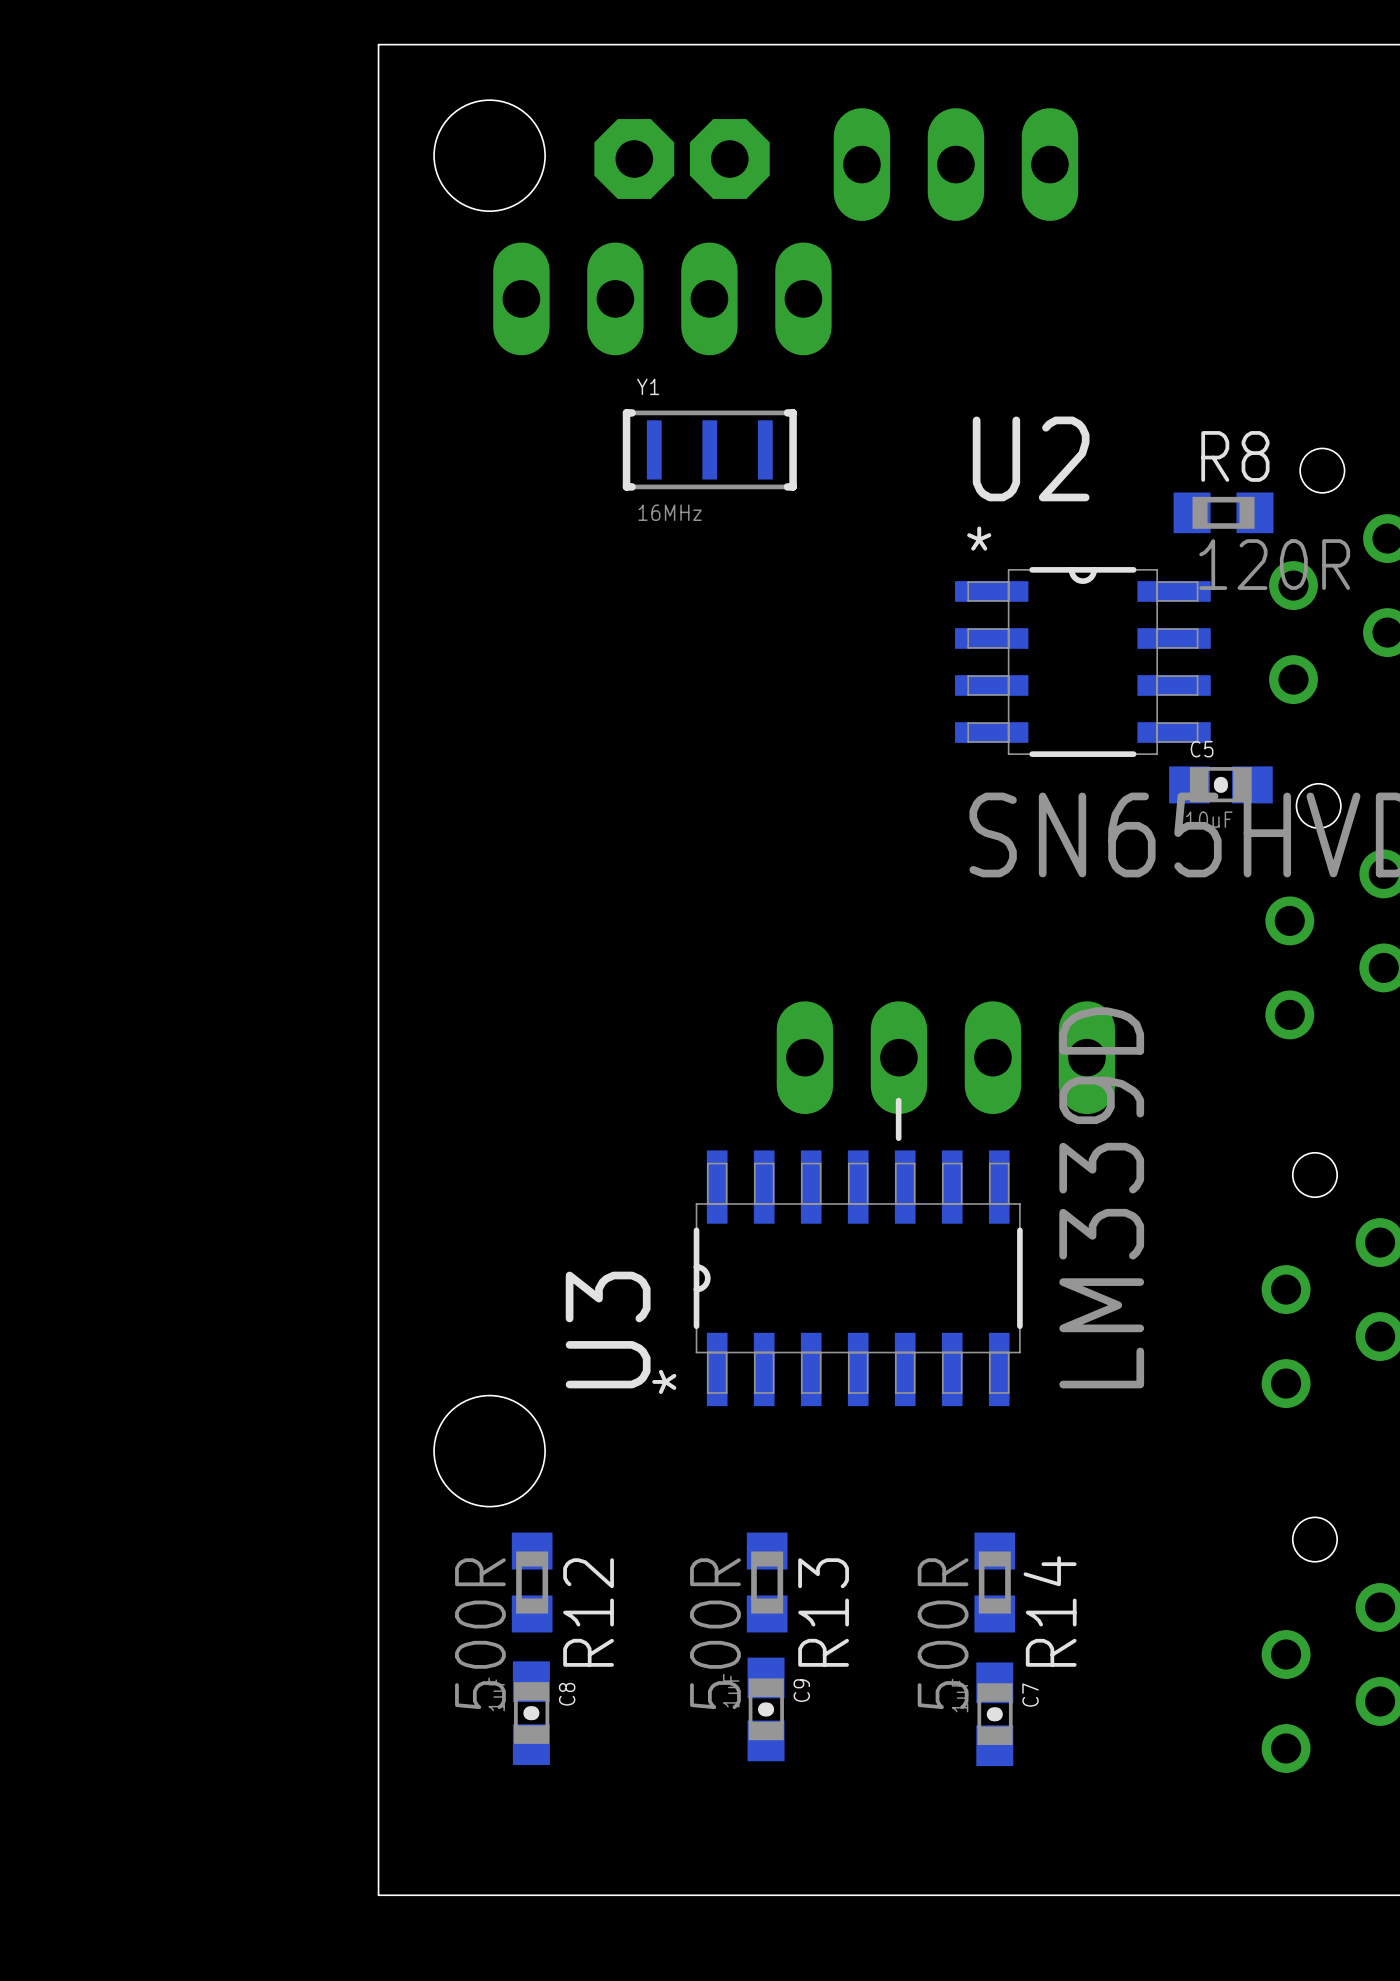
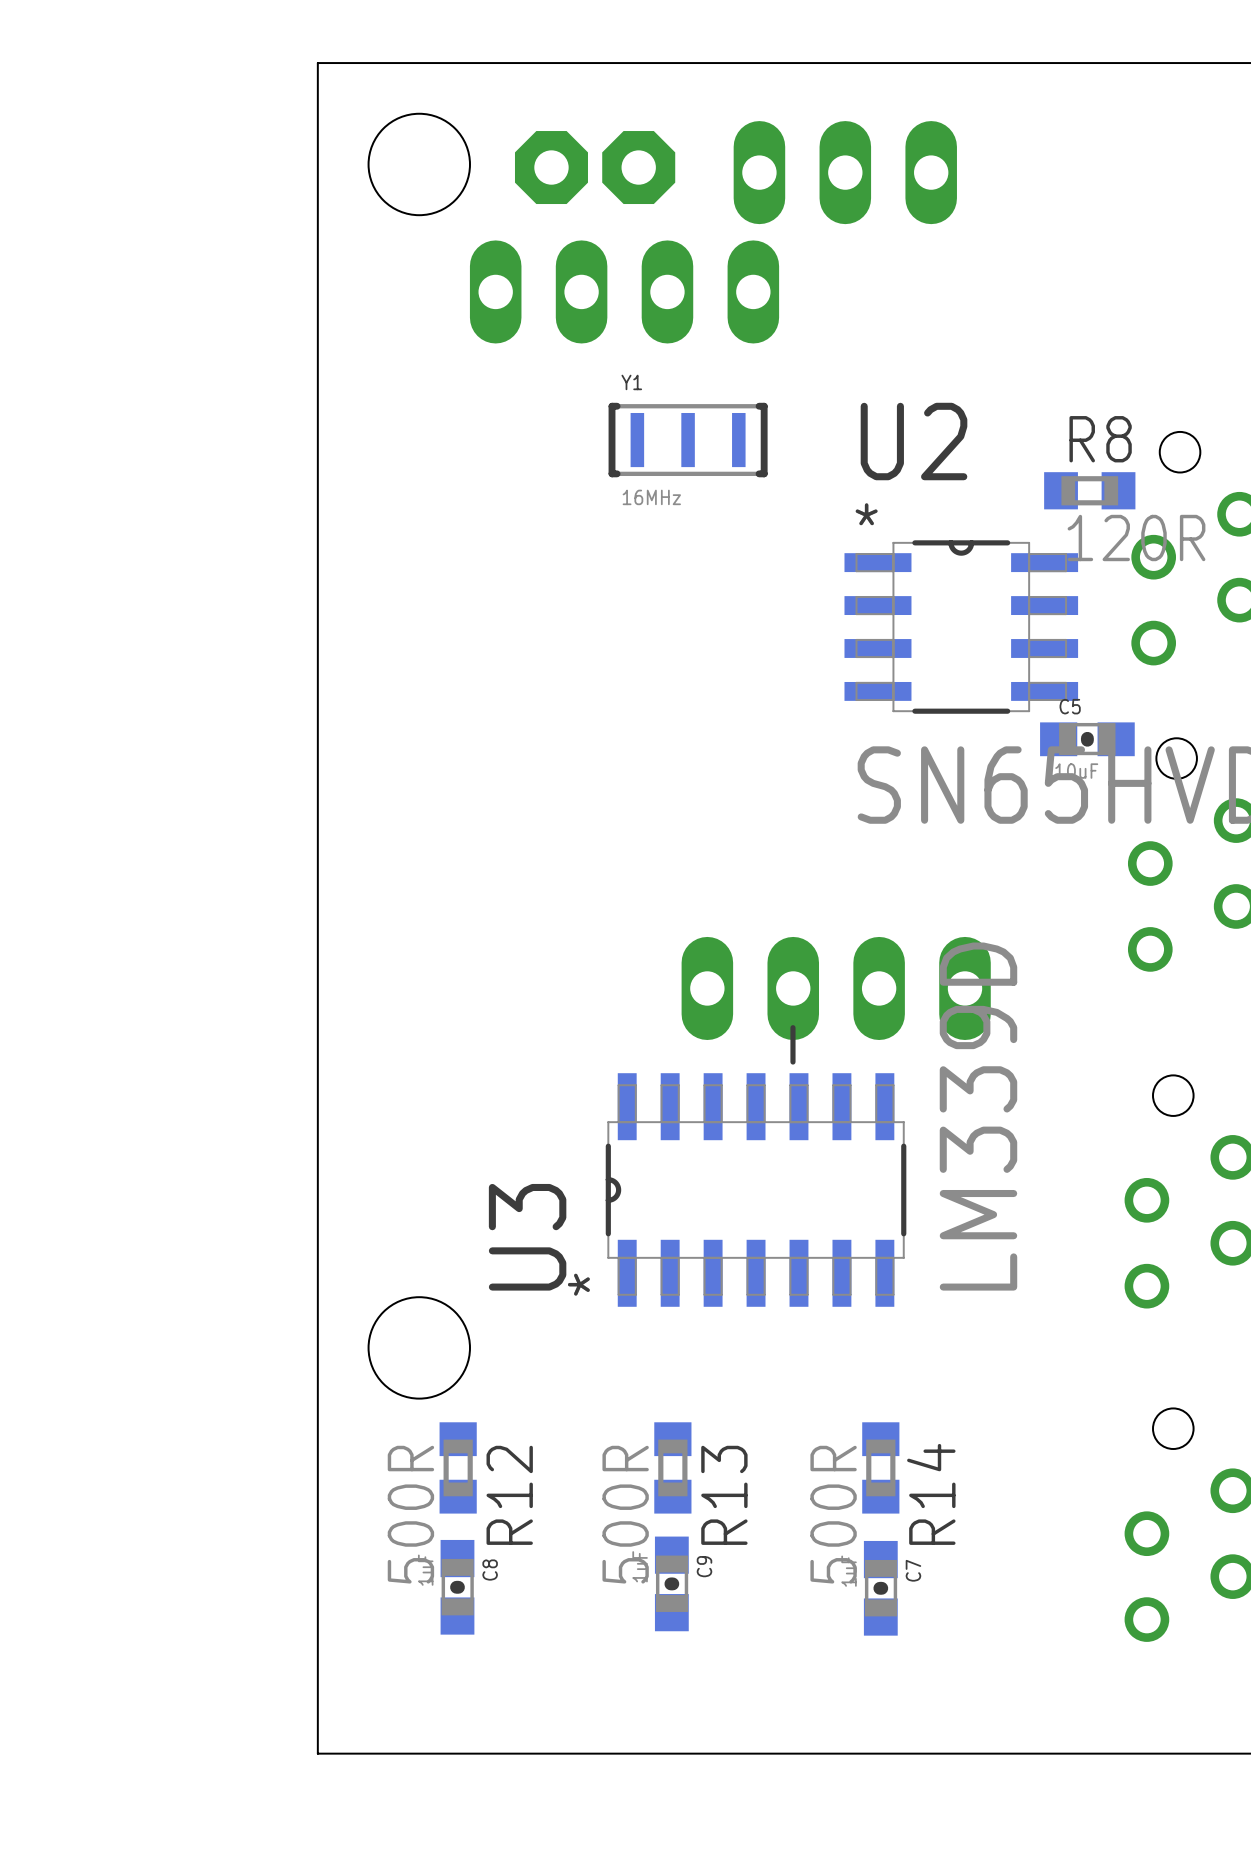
part position: (662, 298) -> (624, 291)
Y1 position: (709, 449) -> (688, 440)

